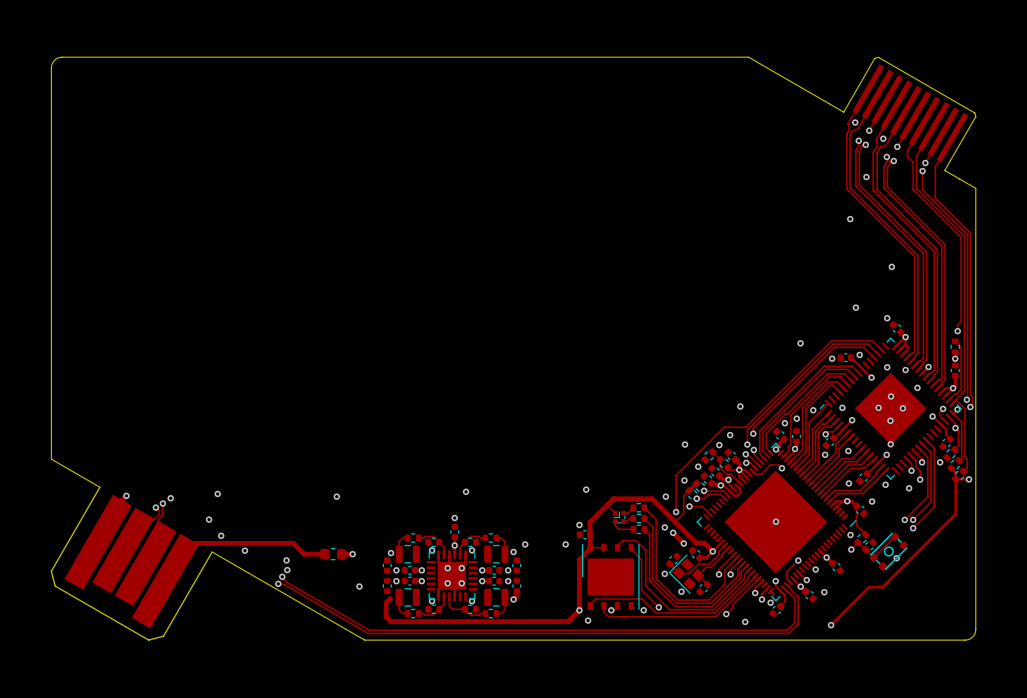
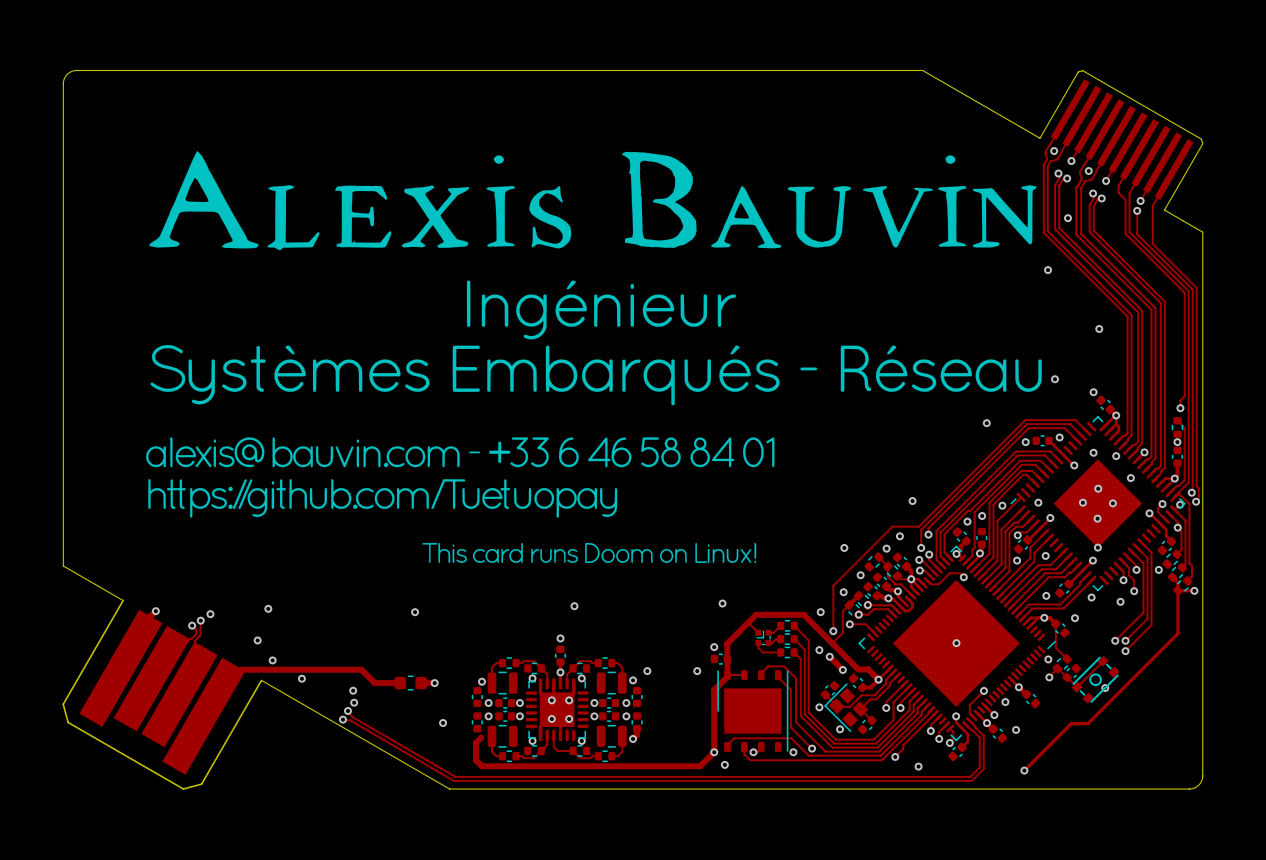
drawing: none -> [146, 151, 1042, 564]

